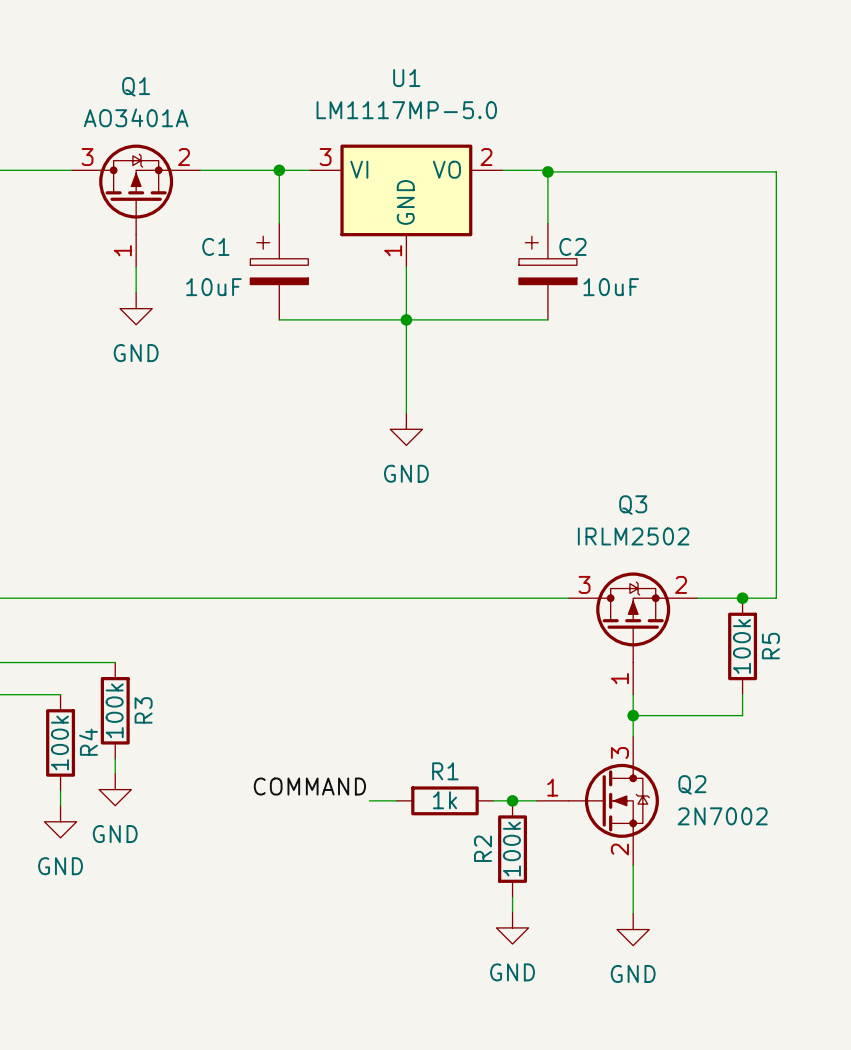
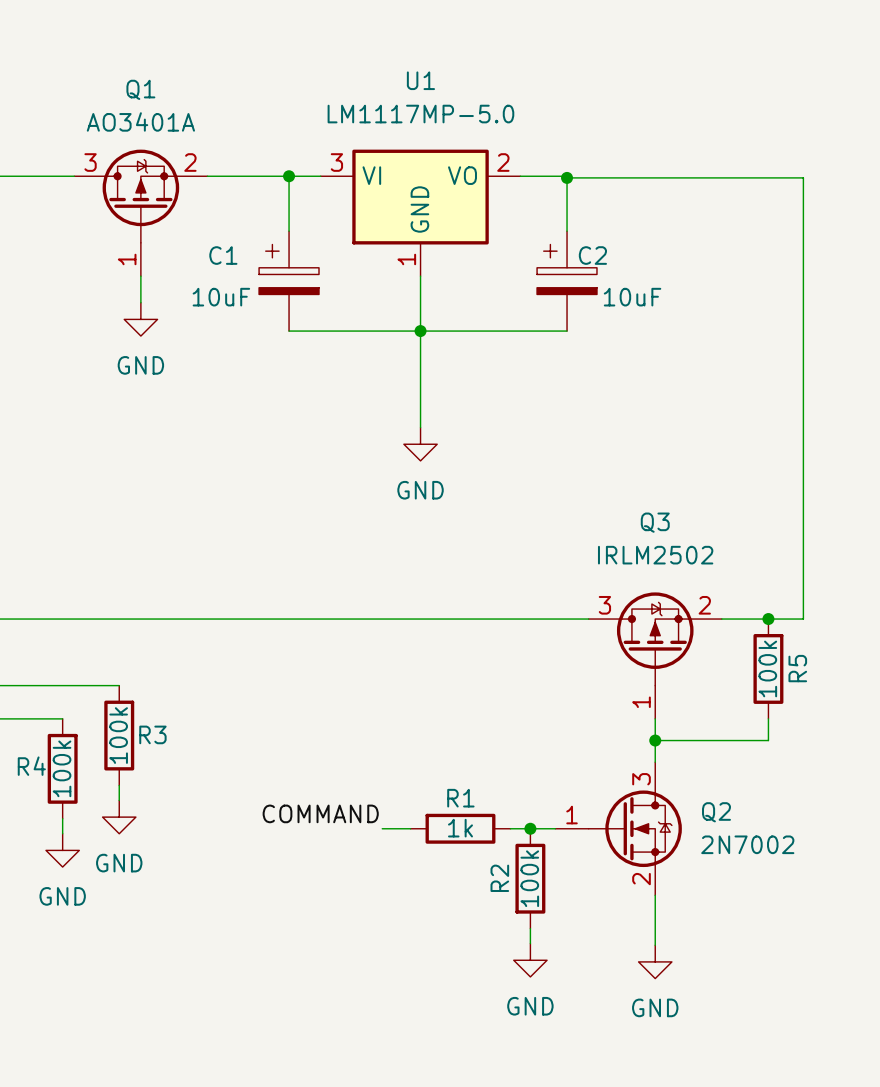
R3 name rotation: 0° (143, 710) -> 90° clockwise (152, 734)
R4 name rotation: 0° (88, 742) -> 90° clockwise (31, 766)
R4 name position: R4 (88, 742) -> R4 (31, 766)

